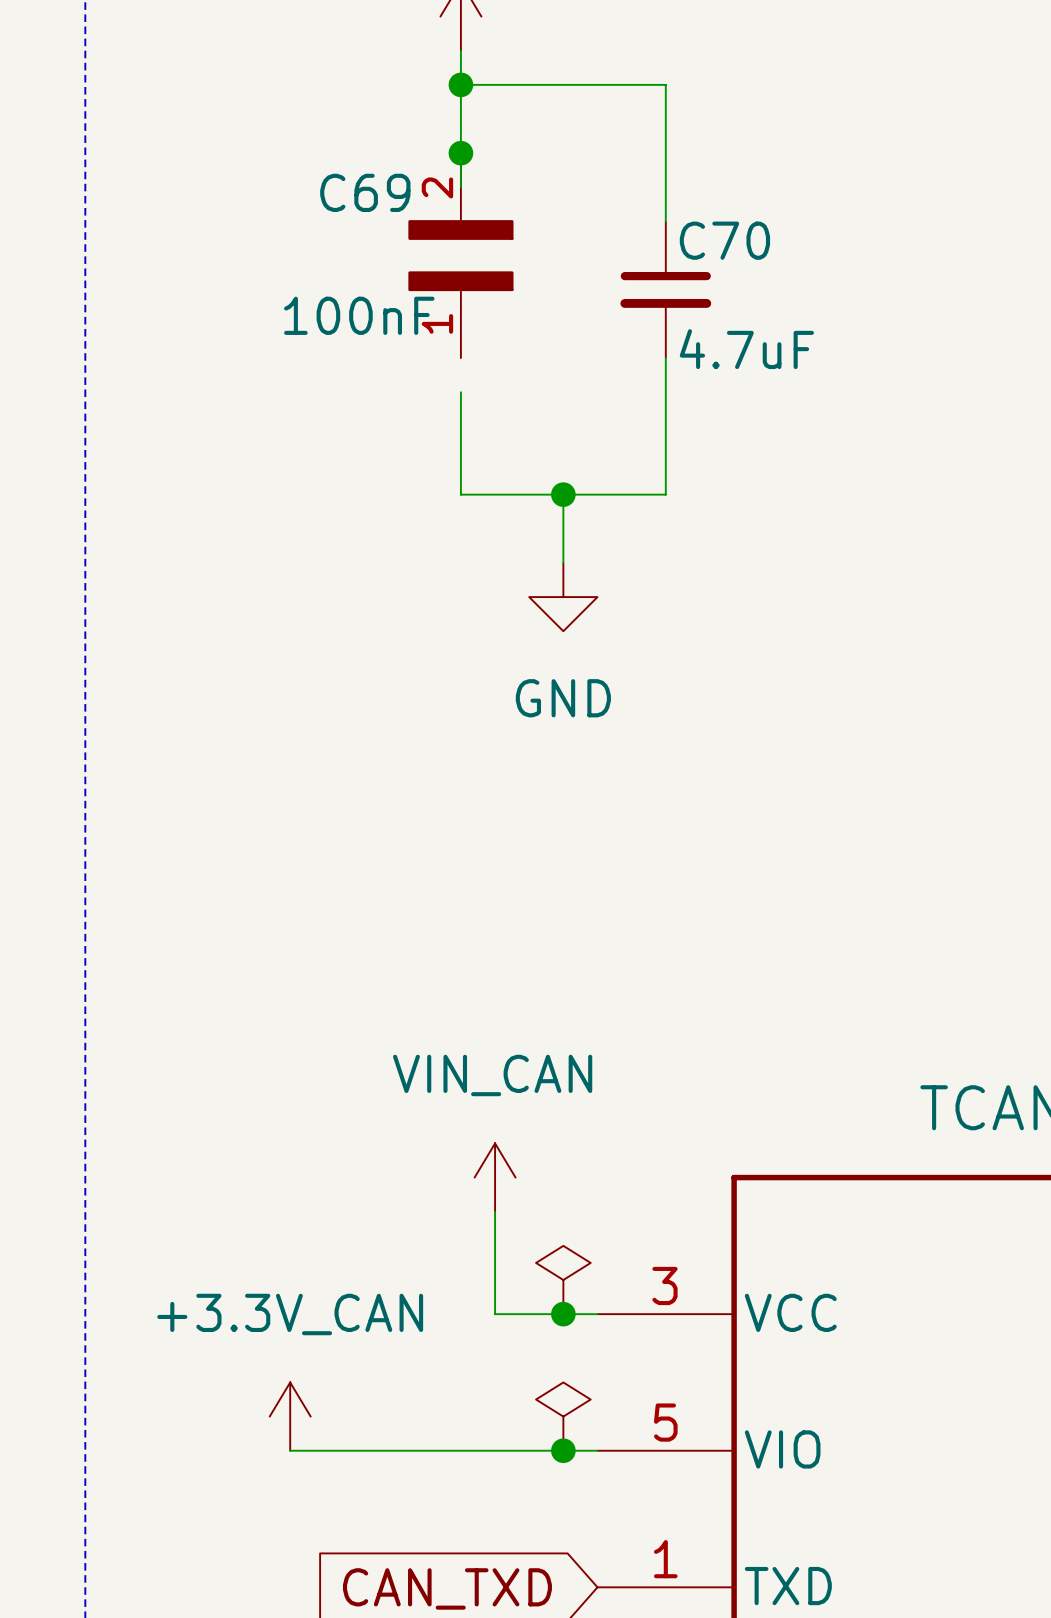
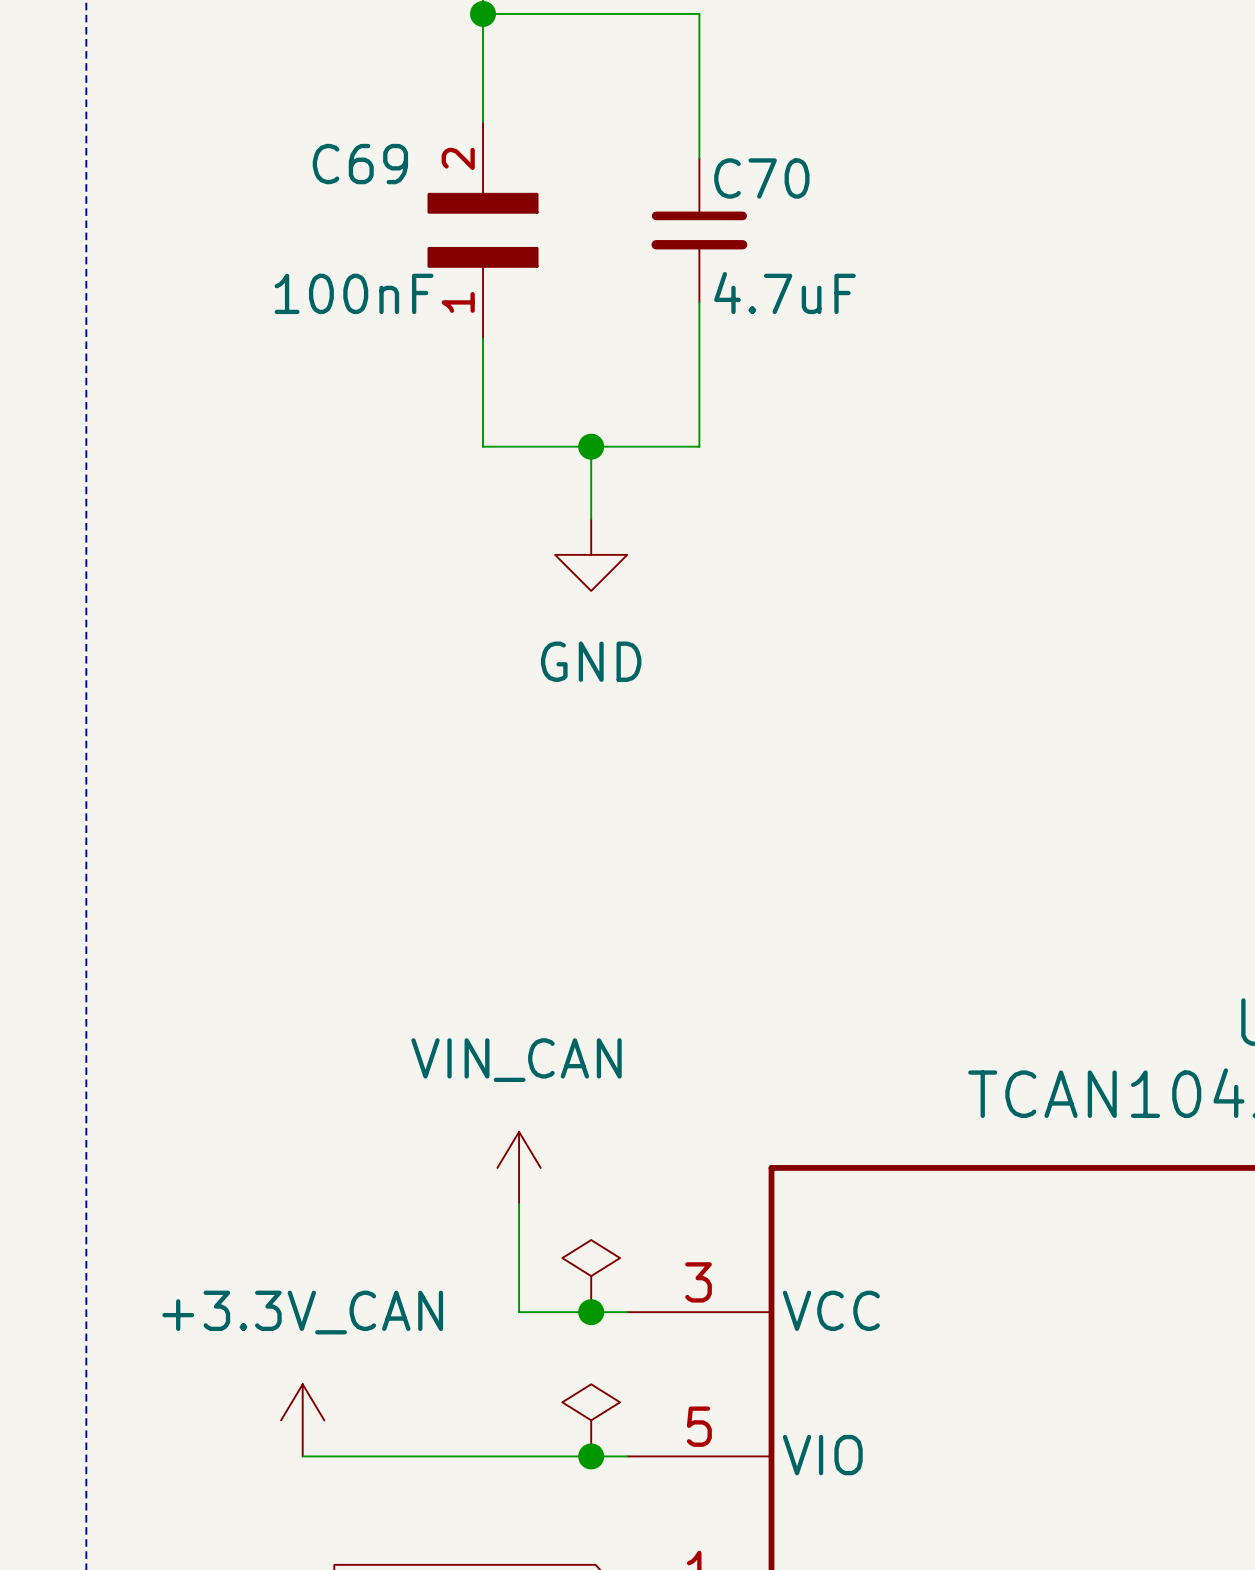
junction: (460, 153) -> none
C69 name position: C69 (365, 192) -> C69 (360, 164)
C69 position: (460, 255) -> (483, 230)
C69 value position: 100nF (359, 315) -> 100nF (354, 293)

